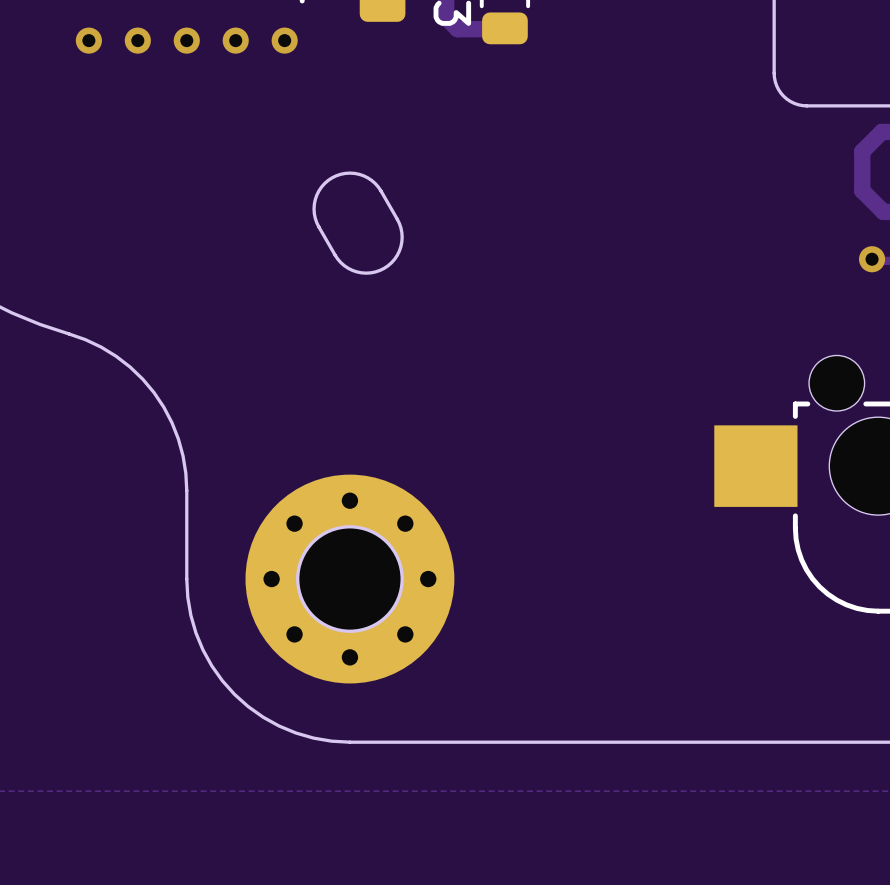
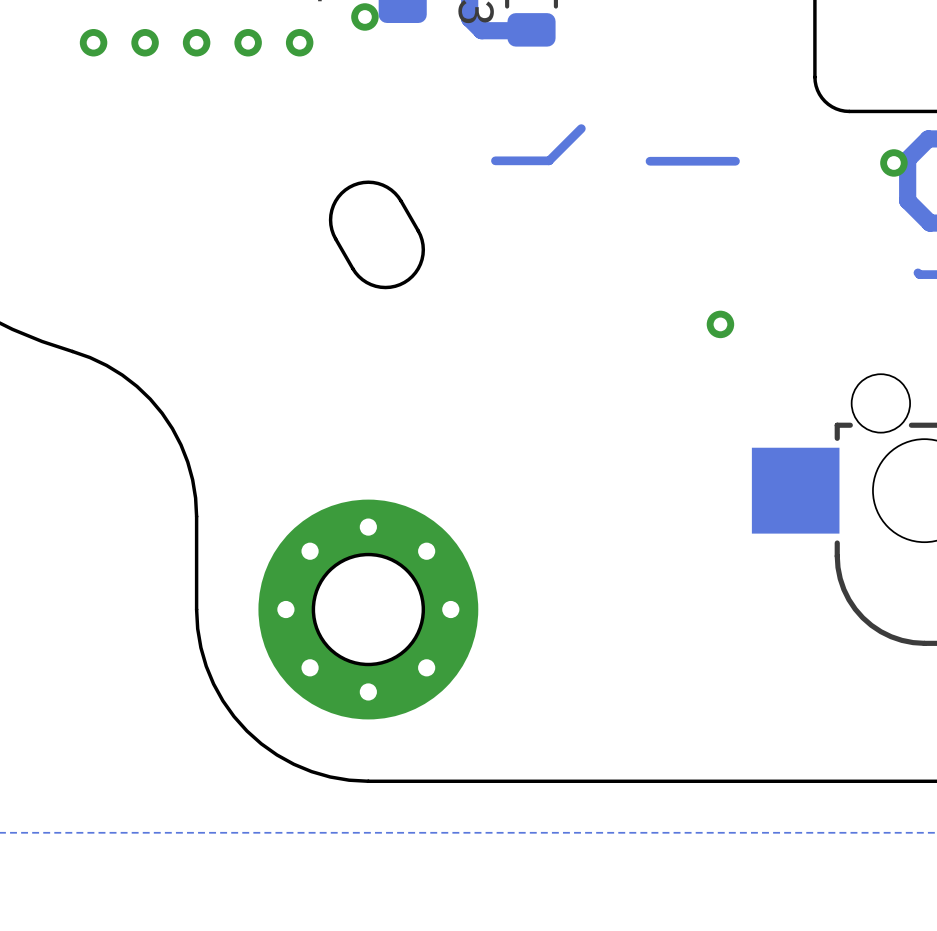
via: none -> (364, 16)
track: none -> (581, 128) (549, 160) (495, 160)
track: none -> (735, 161) (650, 161)
via: none -> (893, 162)
via: (872, 259) -> none
via: none -> (720, 324)

